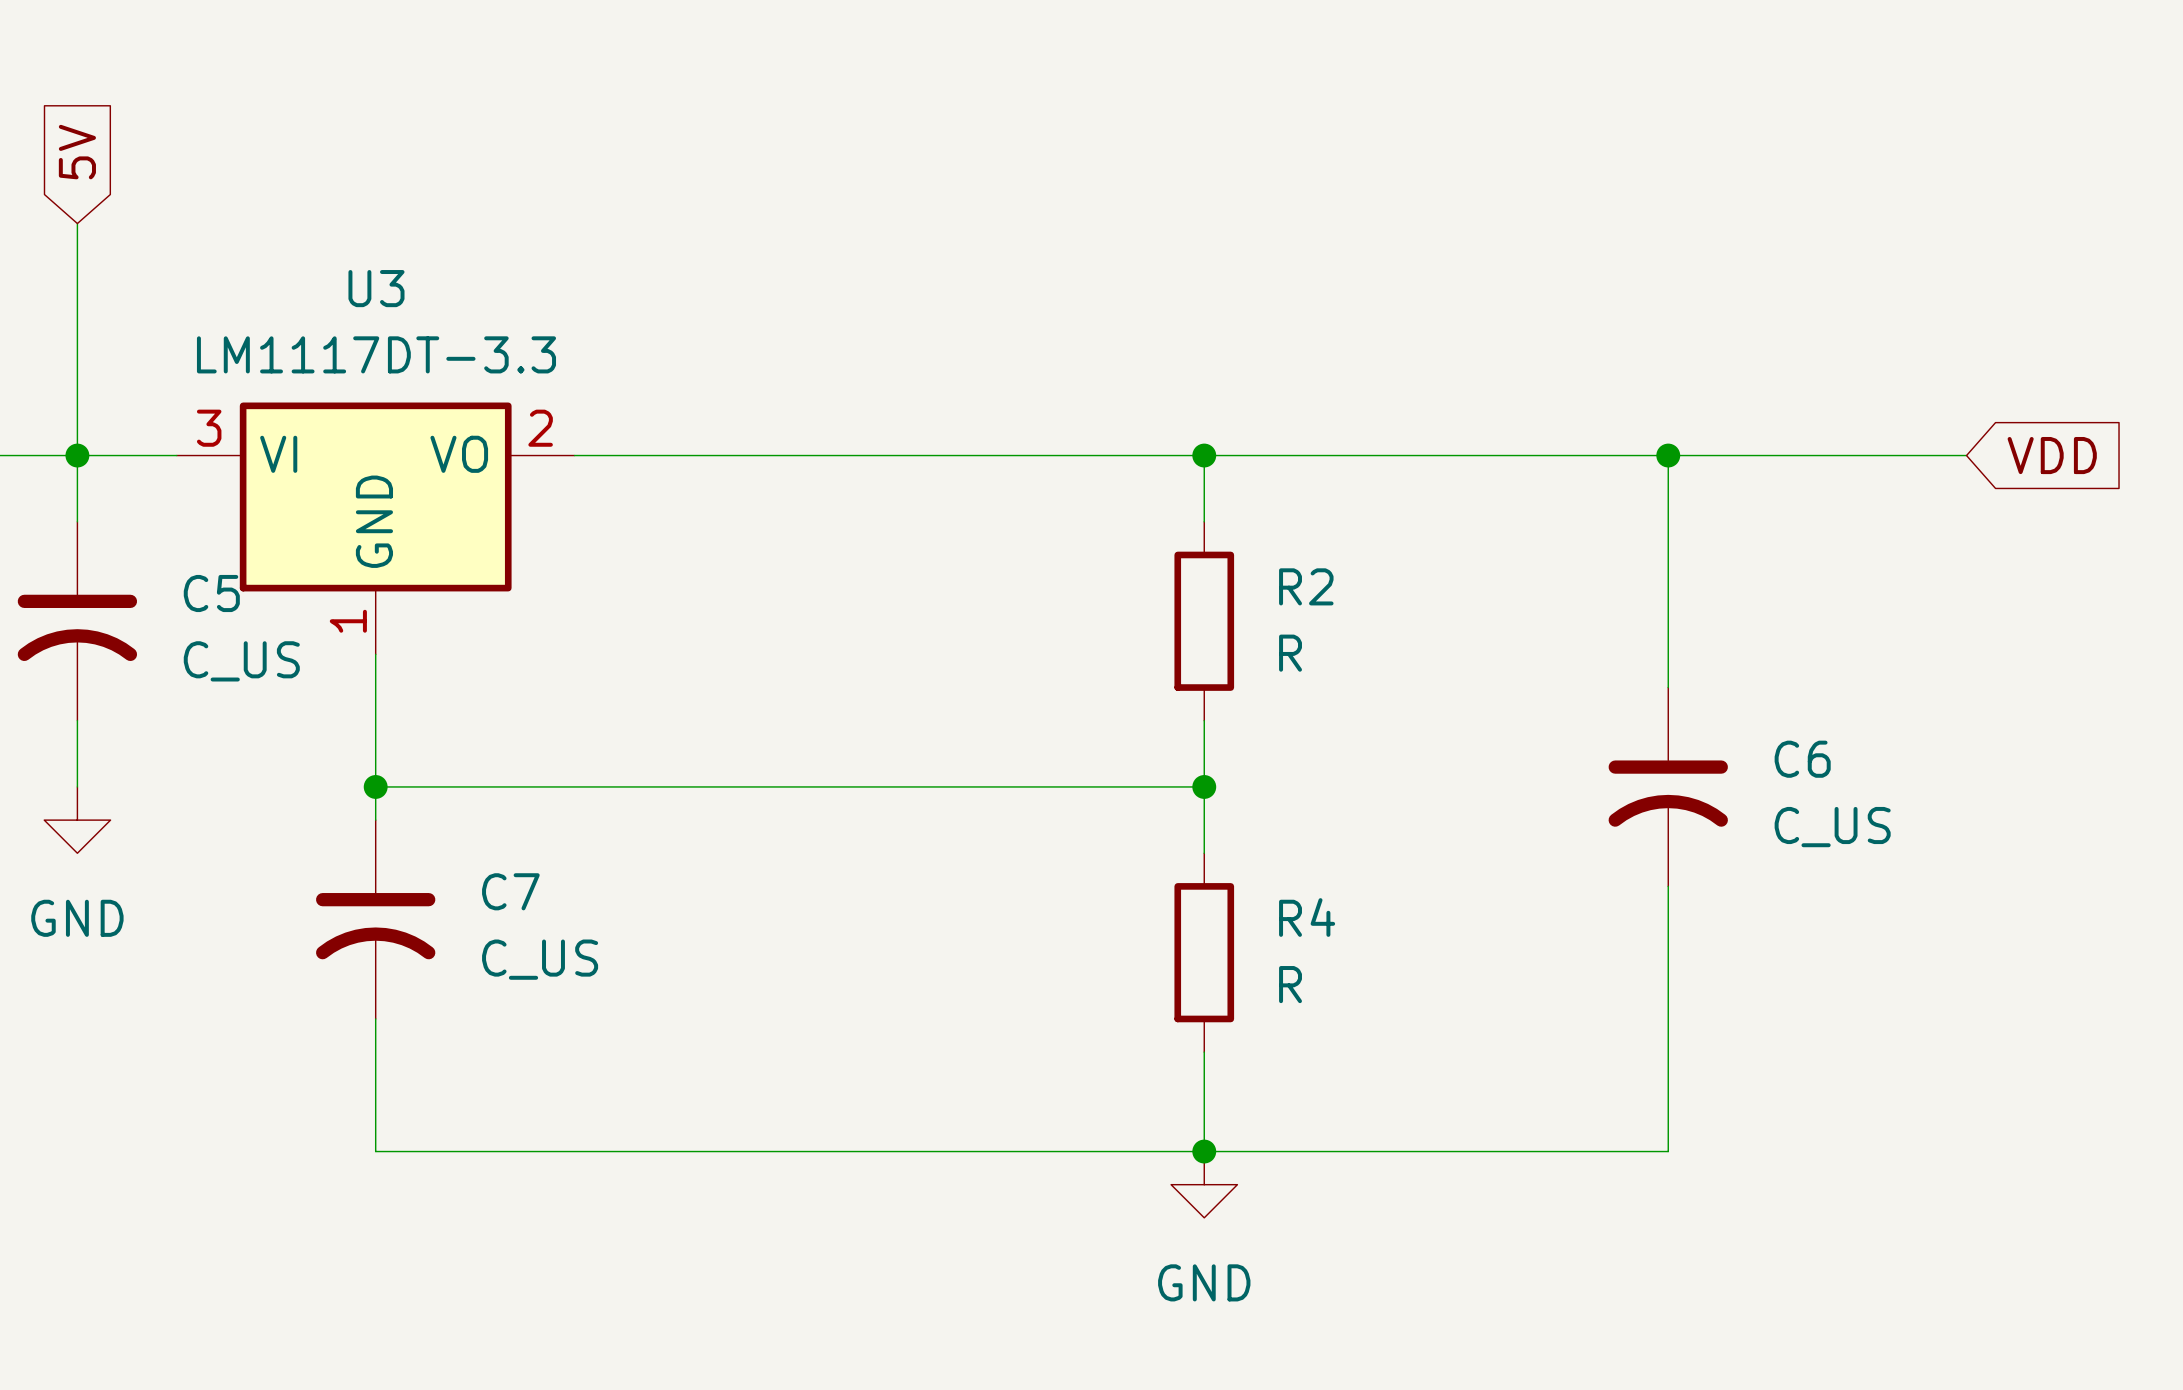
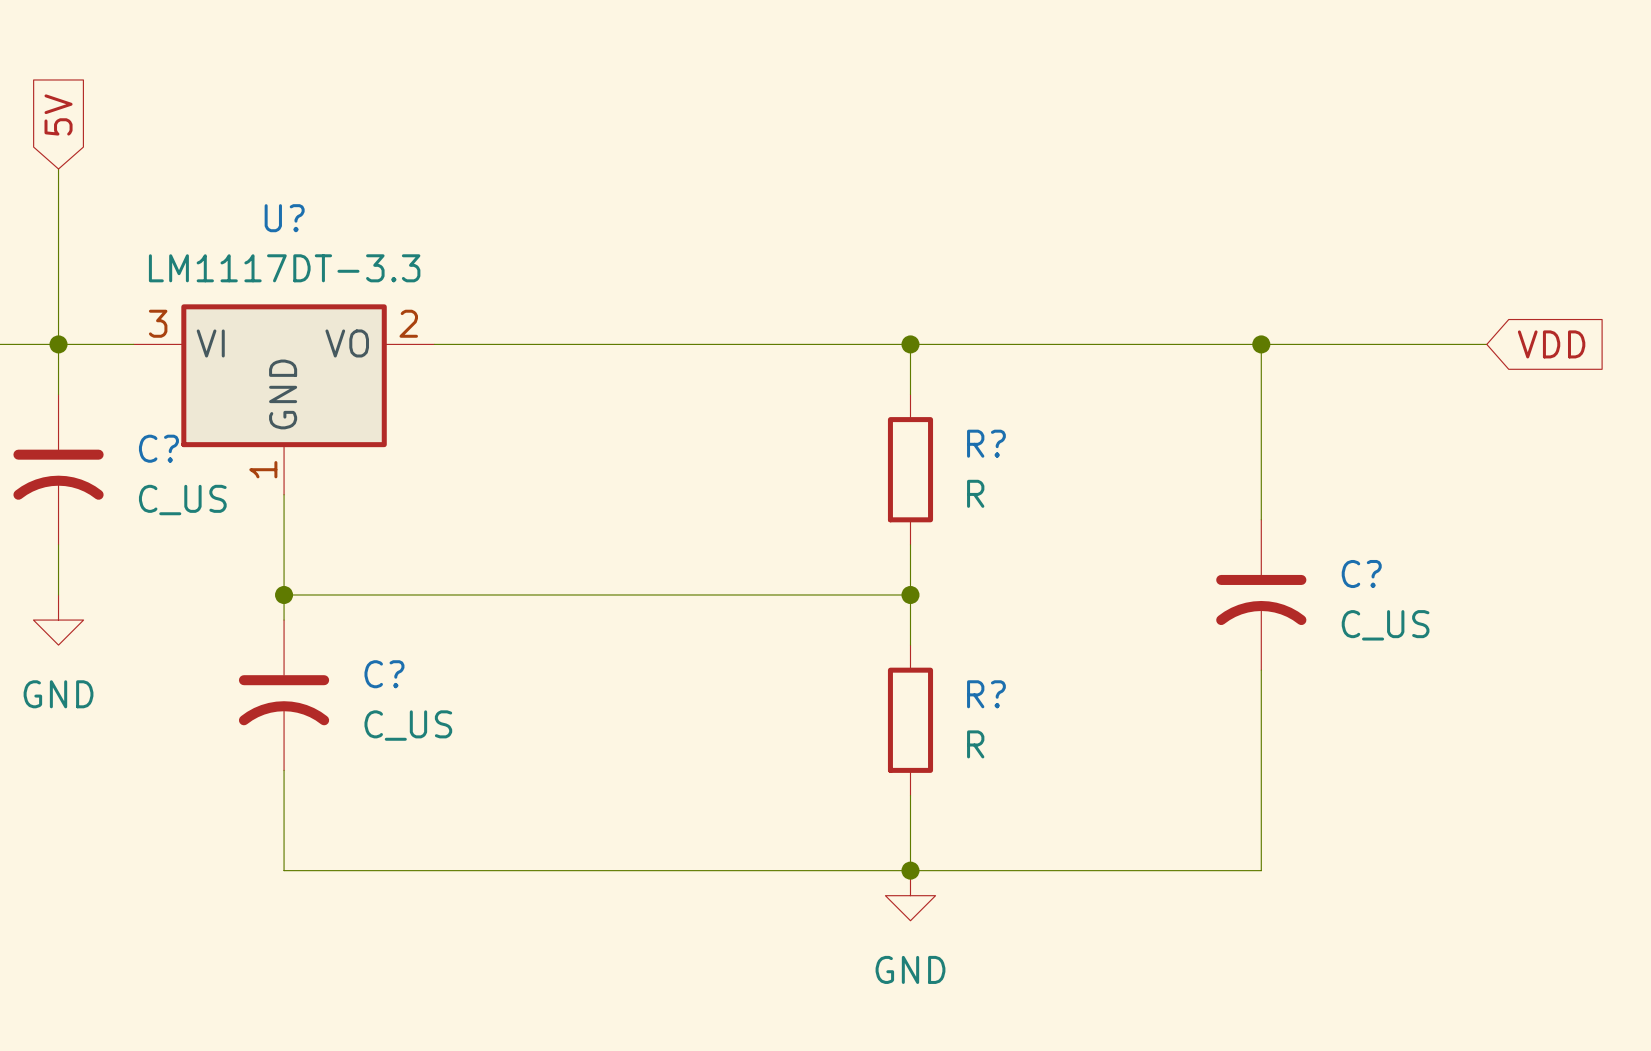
U3 name: U3 (376, 288) -> U? (284, 218)
R2 name: R2 (1306, 586) -> R? (986, 443)
C5 name: C5 (211, 593) -> C? (158, 448)
C6 name: C6 (1802, 759) -> C? (1361, 574)
C7 name: C7 (510, 891) -> C? (384, 674)
R4 name: R4 (1307, 917) -> R? (986, 694)

